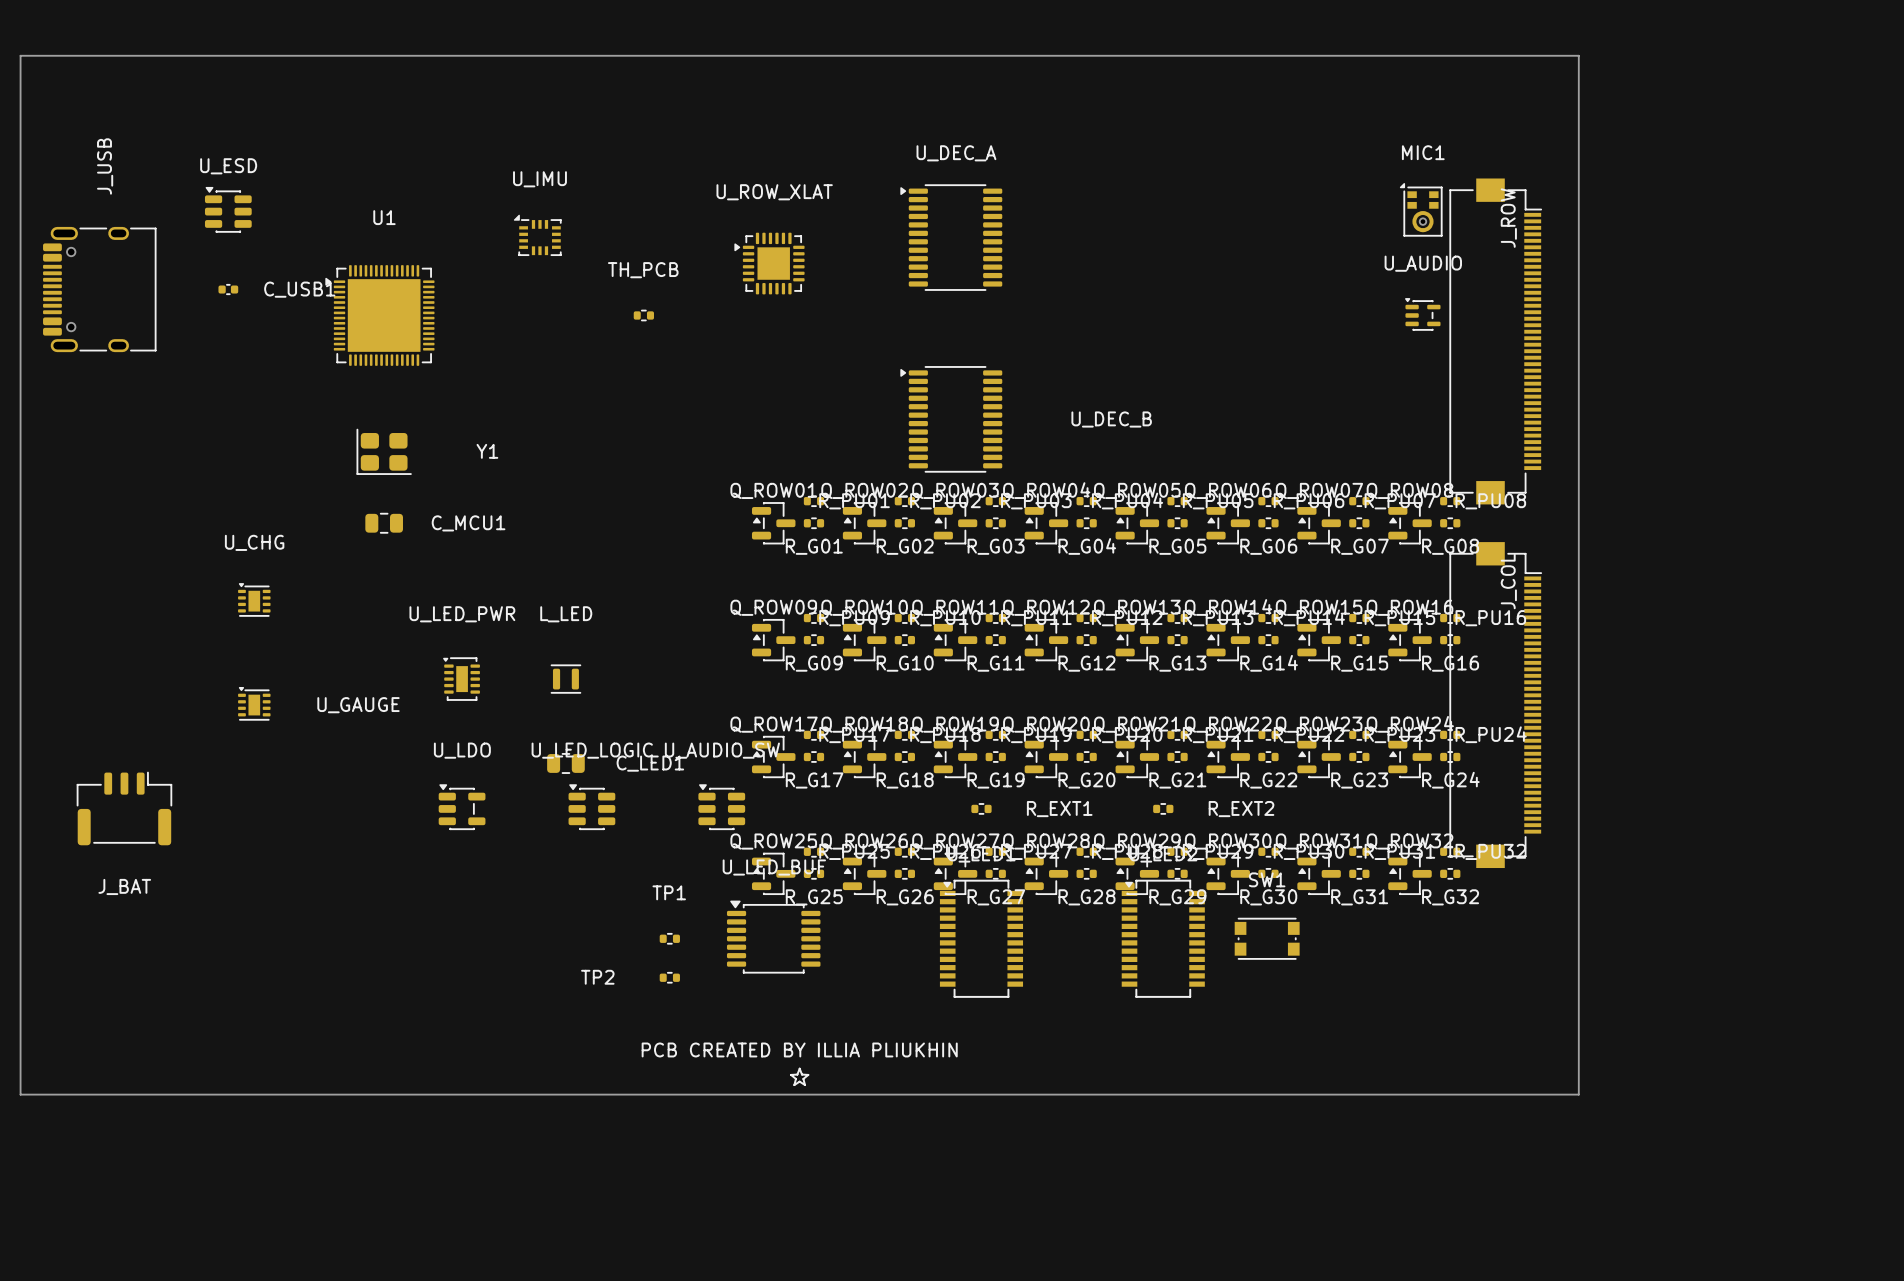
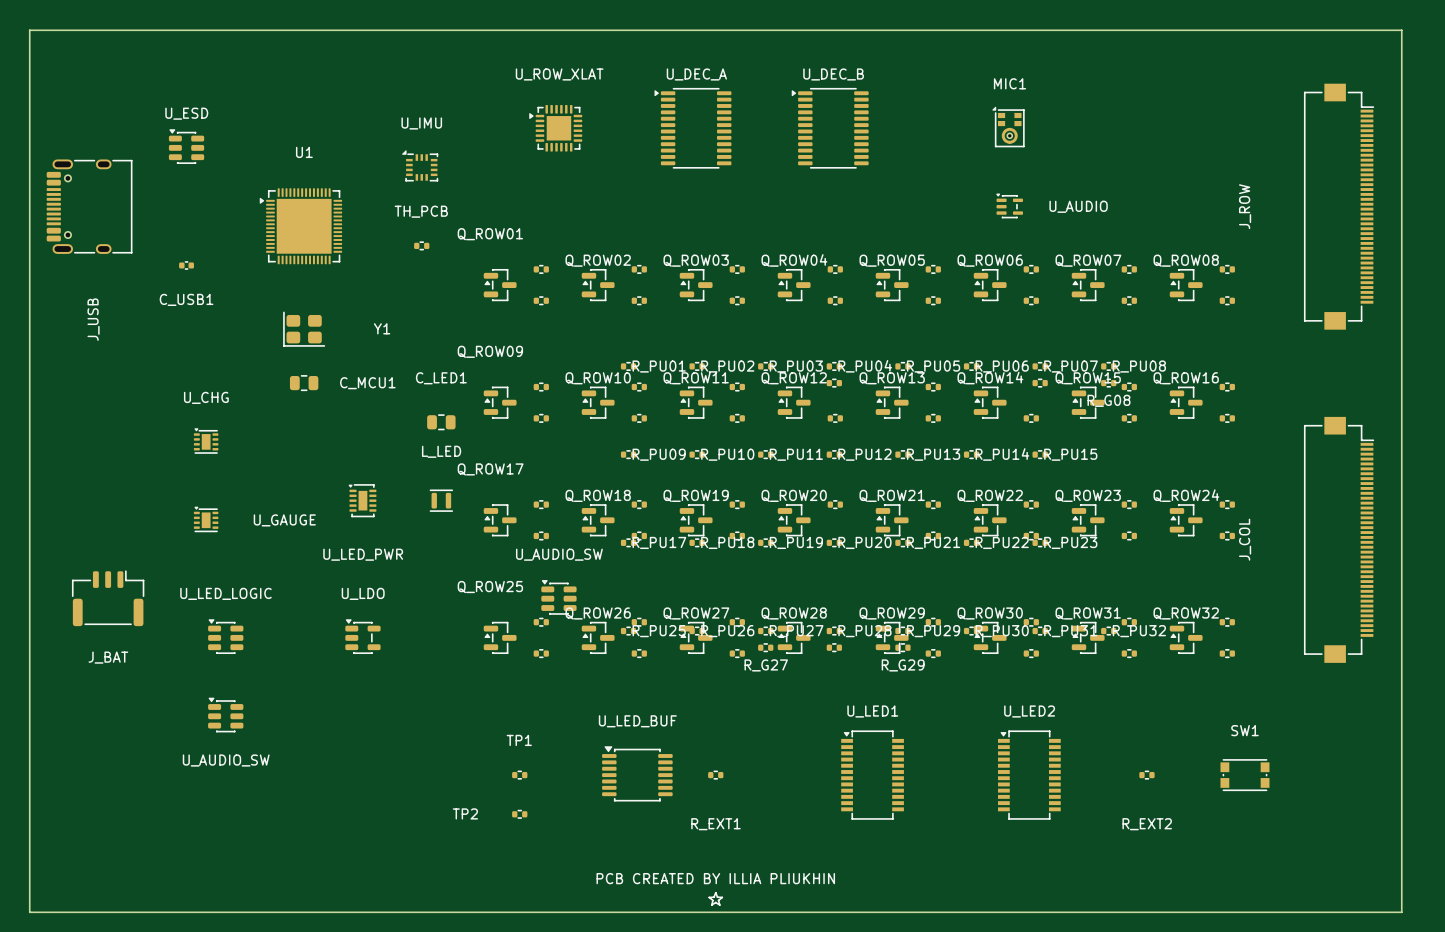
board edge: (1578, 55) (1578, 1094) (20, 1094) -> (1205, 30) (1401, 30) (1401, 912) (29, 912) (29, 814)
U_DEC_A name position: U_DEC_A (956, 153) -> U_DEC_A (696, 74)
J_USB name position: J_USB (105, 166) -> J_USB (93, 319)
MIC1 position: (1421, 209) -> (1008, 126)
J_ROW name position: J_ROW (1508, 218) -> J_ROW (1245, 206)
U_DEC_A position: (951, 237) -> (692, 128)
U_ROW_XLAT position: (769, 263) -> (555, 128)
U_AUDIO name position: U_AUDIO (1423, 263) -> U_AUDIO (1078, 206)
C_USB1 position: (228, 289) -> (186, 265)
C_USB1 name position: C_USB1 (299, 289) -> C_USB1 (186, 299)
U_AUDIO position: (1422, 314) -> (1009, 205)
TH_PCB position: (643, 315) -> (421, 245)
J_ROW position: (1495, 341) -> (1339, 206)
part: none -> (541, 269)
part: none -> (639, 269)
part: none -> (737, 269)
part: none -> (835, 269)
part: none -> (933, 269)
part: none -> (1031, 269)
part: none -> (1129, 269)
part: none -> (1227, 269)
part: none -> (541, 300)
part: none -> (639, 300)
part: none -> (737, 300)
part: none -> (835, 300)
part: none -> (933, 300)
part: none -> (1031, 300)
part: none -> (1129, 300)
part: none -> (1227, 300)
U_DEC_B position: (951, 419) -> (830, 128)
U_DEC_B name position: U_DEC_B (1111, 419) -> U_DEC_B (833, 74)
Q_ROW01 name position: Q_ROW01 (773, 490) -> Q_ROW01 (490, 234)
Q_ROW01 position: (773, 523) -> (500, 285)
R_G01: (813, 523) -> none
Q_ROW02 position: (864, 523) -> (598, 285)
R_G02: (904, 523) -> none
Q_ROW03 position: (955, 523) -> (696, 285)
R_G03: (995, 523) -> none
Q_ROW04 position: (1046, 523) -> (794, 285)
Q_ROW05 position: (1137, 523) -> (892, 285)
R_G05: (1177, 523) -> none
Q_ROW06 position: (1228, 523) -> (990, 285)
R_G06: (1268, 523) -> none
Q_ROW07 position: (1319, 523) -> (1088, 285)
Q_ROW08 position: (1410, 523) -> (1186, 285)
part: none -> (541, 387)
part: none -> (639, 387)
part: none -> (737, 387)
part: none -> (933, 387)
part: none -> (1129, 387)
part: none -> (1227, 387)
R_G04 name: R_G04 (1087, 546) -> none
R_G07 name: R_G07 (1359, 546) -> none
part: none -> (541, 418)
part: none -> (639, 418)
part: none -> (737, 418)
part: none -> (835, 418)
part: none -> (933, 418)
part: none -> (1031, 418)
part: none -> (1129, 418)
part: none -> (1227, 418)
J_COL name position: J_COL (1508, 581) -> J_COL (1245, 539)
Q_ROW09 name position: Q_ROW09 (773, 607) -> Q_ROW09 (490, 351)
U_LED_PWR name position: U_LED_PWR (462, 614) -> U_LED_PWR (363, 554)
R_PU16: (1450, 618) -> none
Q_ROW09 position: (773, 640) -> (500, 402)
R_G09: (813, 640) -> none
Q_ROW10 position: (864, 640) -> (598, 402)
R_G10: (904, 640) -> none
Q_ROW11 position: (955, 640) -> (696, 402)
R_G11: (995, 640) -> none
Q_ROW12 position: (1046, 640) -> (794, 402)
R_G12: (1086, 640) -> none
Q_ROW13 position: (1137, 640) -> (892, 402)
R_G13: (1177, 640) -> none
Q_ROW14 position: (1228, 640) -> (990, 402)
R_G14: (1268, 640) -> none
Q_ROW15 position: (1319, 640) -> (1088, 402)
R_G15: (1359, 640) -> none
Q_ROW16 position: (1410, 640) -> (1186, 402)
R_G16: (1450, 640) -> none
part: none -> (541, 504)
part: none -> (639, 504)
part: none -> (737, 504)
part: none -> (835, 504)
part: none -> (933, 504)
part: none -> (1031, 504)
part: none -> (1129, 504)
part: none -> (1227, 504)
J_COL position: (1495, 705) -> (1339, 539)
Q_ROW17 name position: Q_ROW17 (774, 724) -> Q_ROW17 (490, 469)
part: none -> (541, 535)
part: none -> (639, 535)
part: none -> (737, 535)
part: none -> (933, 535)
part: none -> (1031, 535)
part: none -> (1129, 535)
part: none -> (1227, 535)
R_PU24: (1450, 734) -> none
Q_ROW17 position: (773, 756) -> (500, 520)
R_G17: (813, 756) -> none
Q_ROW18 position: (864, 756) -> (598, 520)
R_G18: (904, 756) -> none
Q_ROW19 position: (955, 756) -> (696, 520)
R_G19: (995, 756) -> none
Q_ROW20 position: (1046, 756) -> (794, 520)
R_G20: (1086, 756) -> none
Q_ROW21 position: (1137, 756) -> (892, 520)
R_G21: (1177, 756) -> none
Q_ROW22 position: (1228, 756) -> (990, 520)
R_G22: (1268, 756) -> none
Q_ROW23 position: (1319, 756) -> (1088, 520)
R_G23: (1359, 756) -> none
Q_ROW24 position: (1410, 756) -> (1186, 520)
R_G24: (1450, 756) -> none
C_LED1 position: (565, 763) -> (441, 422)
C_LED1 name position: C_LED1 (650, 763) -> C_LED1 (441, 378)
U_LDO position: (462, 807) -> (362, 636)
U_LED_LOGIC position: (591, 807) -> (225, 636)
R_EXT1 position: (981, 808) -> (715, 775)
R_EXT2 position: (1163, 808) -> (1146, 775)
R_EXT1 name position: R_EXT1 (1059, 809) -> R_EXT1 (715, 824)
R_EXT2 name position: R_EXT2 (1241, 809) -> R_EXT2 (1147, 824)
part: none -> (541, 622)
part: none -> (639, 622)
part: none -> (737, 622)
part: none -> (933, 622)
part: none -> (1031, 622)
part: none -> (1129, 622)
part: none -> (1227, 622)
Q_ROW25 name position: Q_ROW25 (773, 841) -> Q_ROW25 (490, 587)
Q_ROW25 position: (773, 873) -> (500, 637)
R_G25: (813, 873) -> none
Q_ROW26 position: (864, 873) -> (598, 637)
R_G26: (904, 873) -> none
Q_ROW27 position: (955, 873) -> (696, 637)
Q_ROW28 position: (1046, 873) -> (794, 637)
Q_ROW29 position: (1137, 873) -> (892, 637)
Q_ROW30 position: (1228, 873) -> (990, 637)
R_G30: (1268, 873) -> none
Q_ROW31 position: (1319, 873) -> (1088, 637)
R_G31: (1359, 873) -> none
Q_ROW32 position: (1410, 873) -> (1186, 637)
R_G32: (1450, 873) -> none
part: none -> (541, 653)
part: none -> (639, 653)
part: none -> (737, 653)
part: none -> (933, 653)
part: none -> (1031, 653)
part: none -> (1129, 653)
part: none -> (1227, 653)
R_G28 name: R_G28 (1086, 897) -> none
U_LED_BUF position: (773, 937) -> (637, 773)
TP1 position: (669, 938) -> (519, 775)
U_LED1 position: (981, 938) -> (872, 775)
U_LED2 position: (1163, 938) -> (1029, 775)
SW1 position: (1267, 938) -> (1244, 775)
U_AUDIO_SW: none -> (225, 714)
TP2 position: (669, 977) -> (519, 814)
text position: PCB CREATED BY ILLIA PLIUKHIN (799, 1049) -> PCB CREATED BY ILLIA PLIUKHIN (715, 878)
line: (799, 1068) (797, 1074) (791, 1074) (795, 1078) (794, 1085) (799, 1081) (805, 1085) (803, 1078) (808, 1074) (801, 1074) (799, 1068) -> (715, 892) (714, 897) (709, 897) (712, 900) (711, 905) (715, 902) (719, 905) (718, 900) (722, 897) (717, 897) (715, 892)

